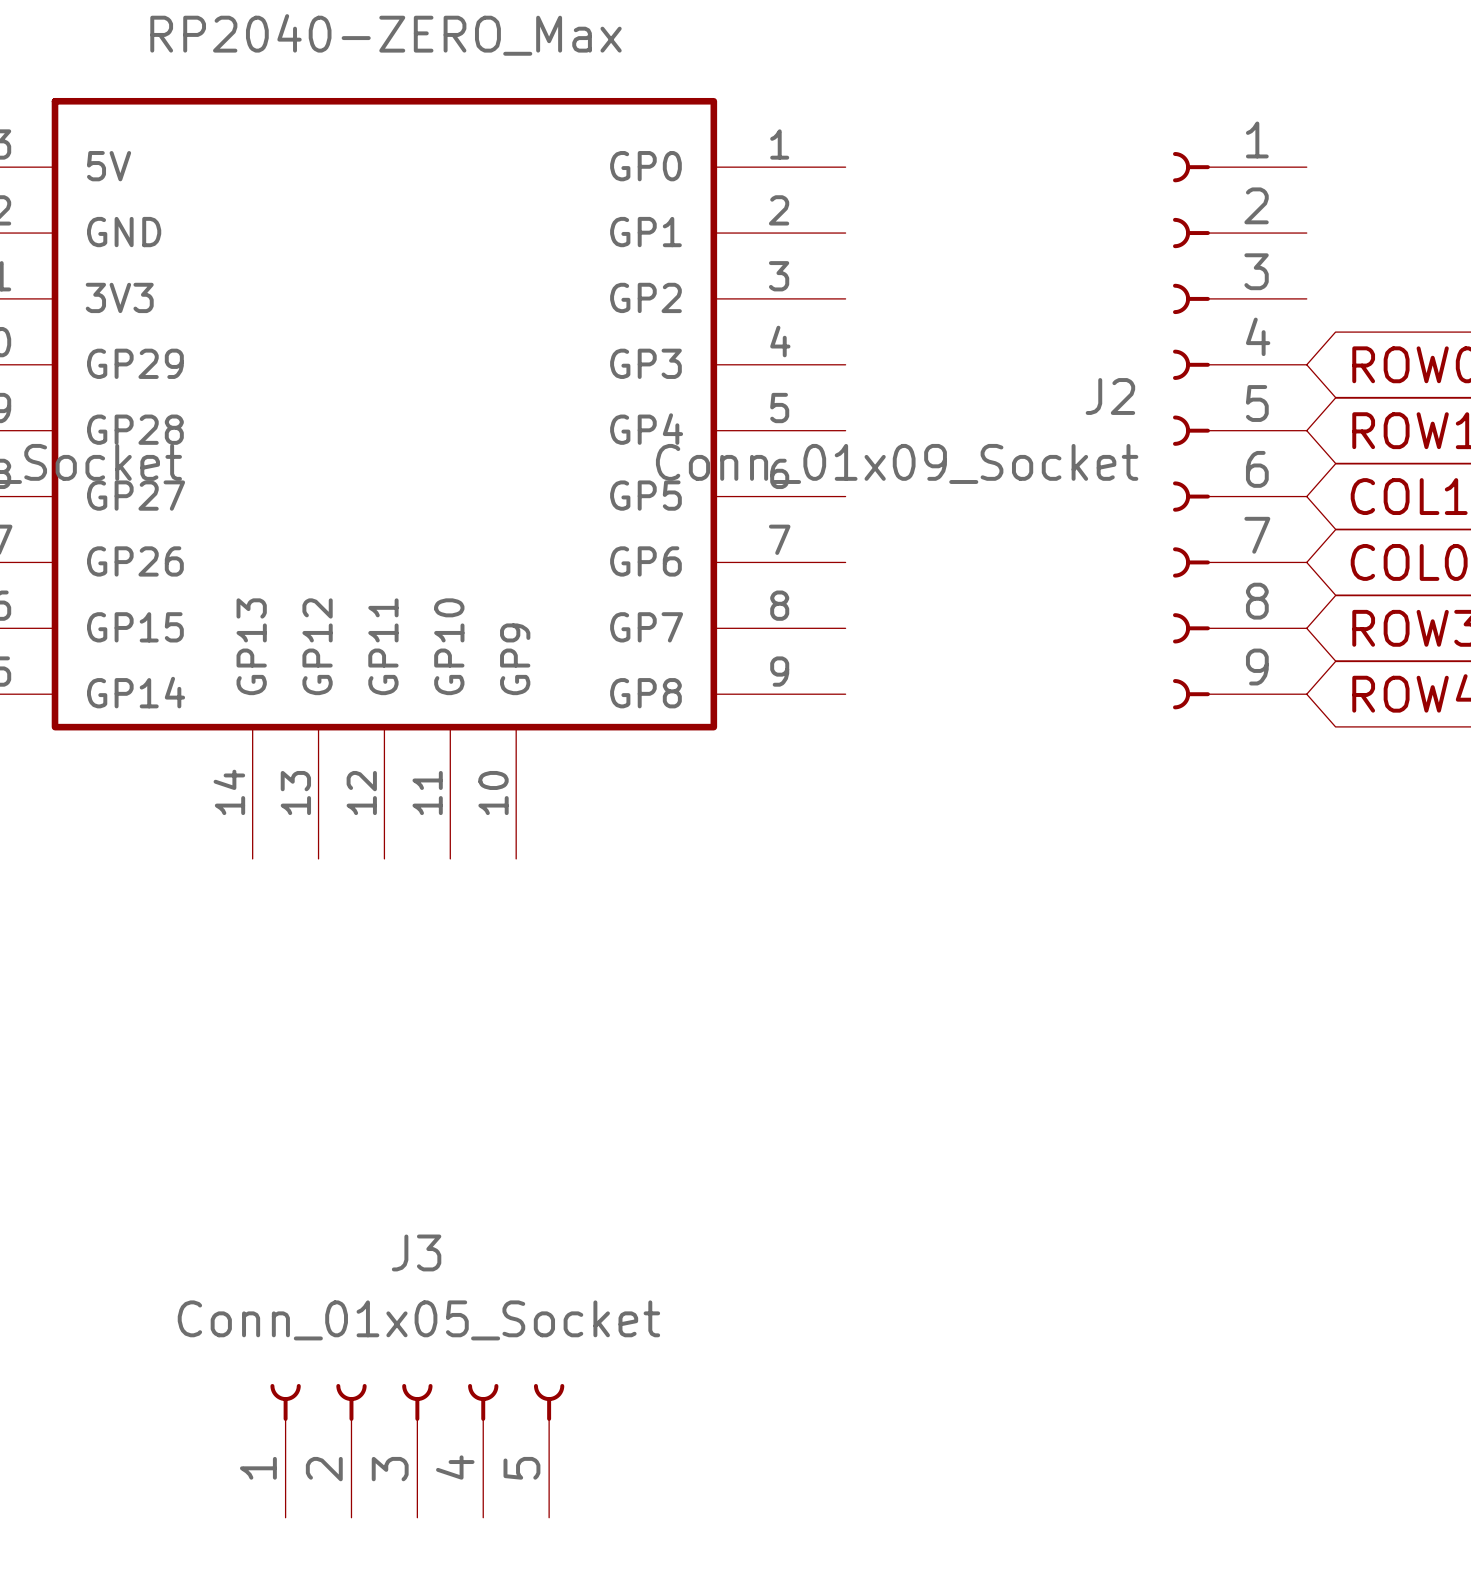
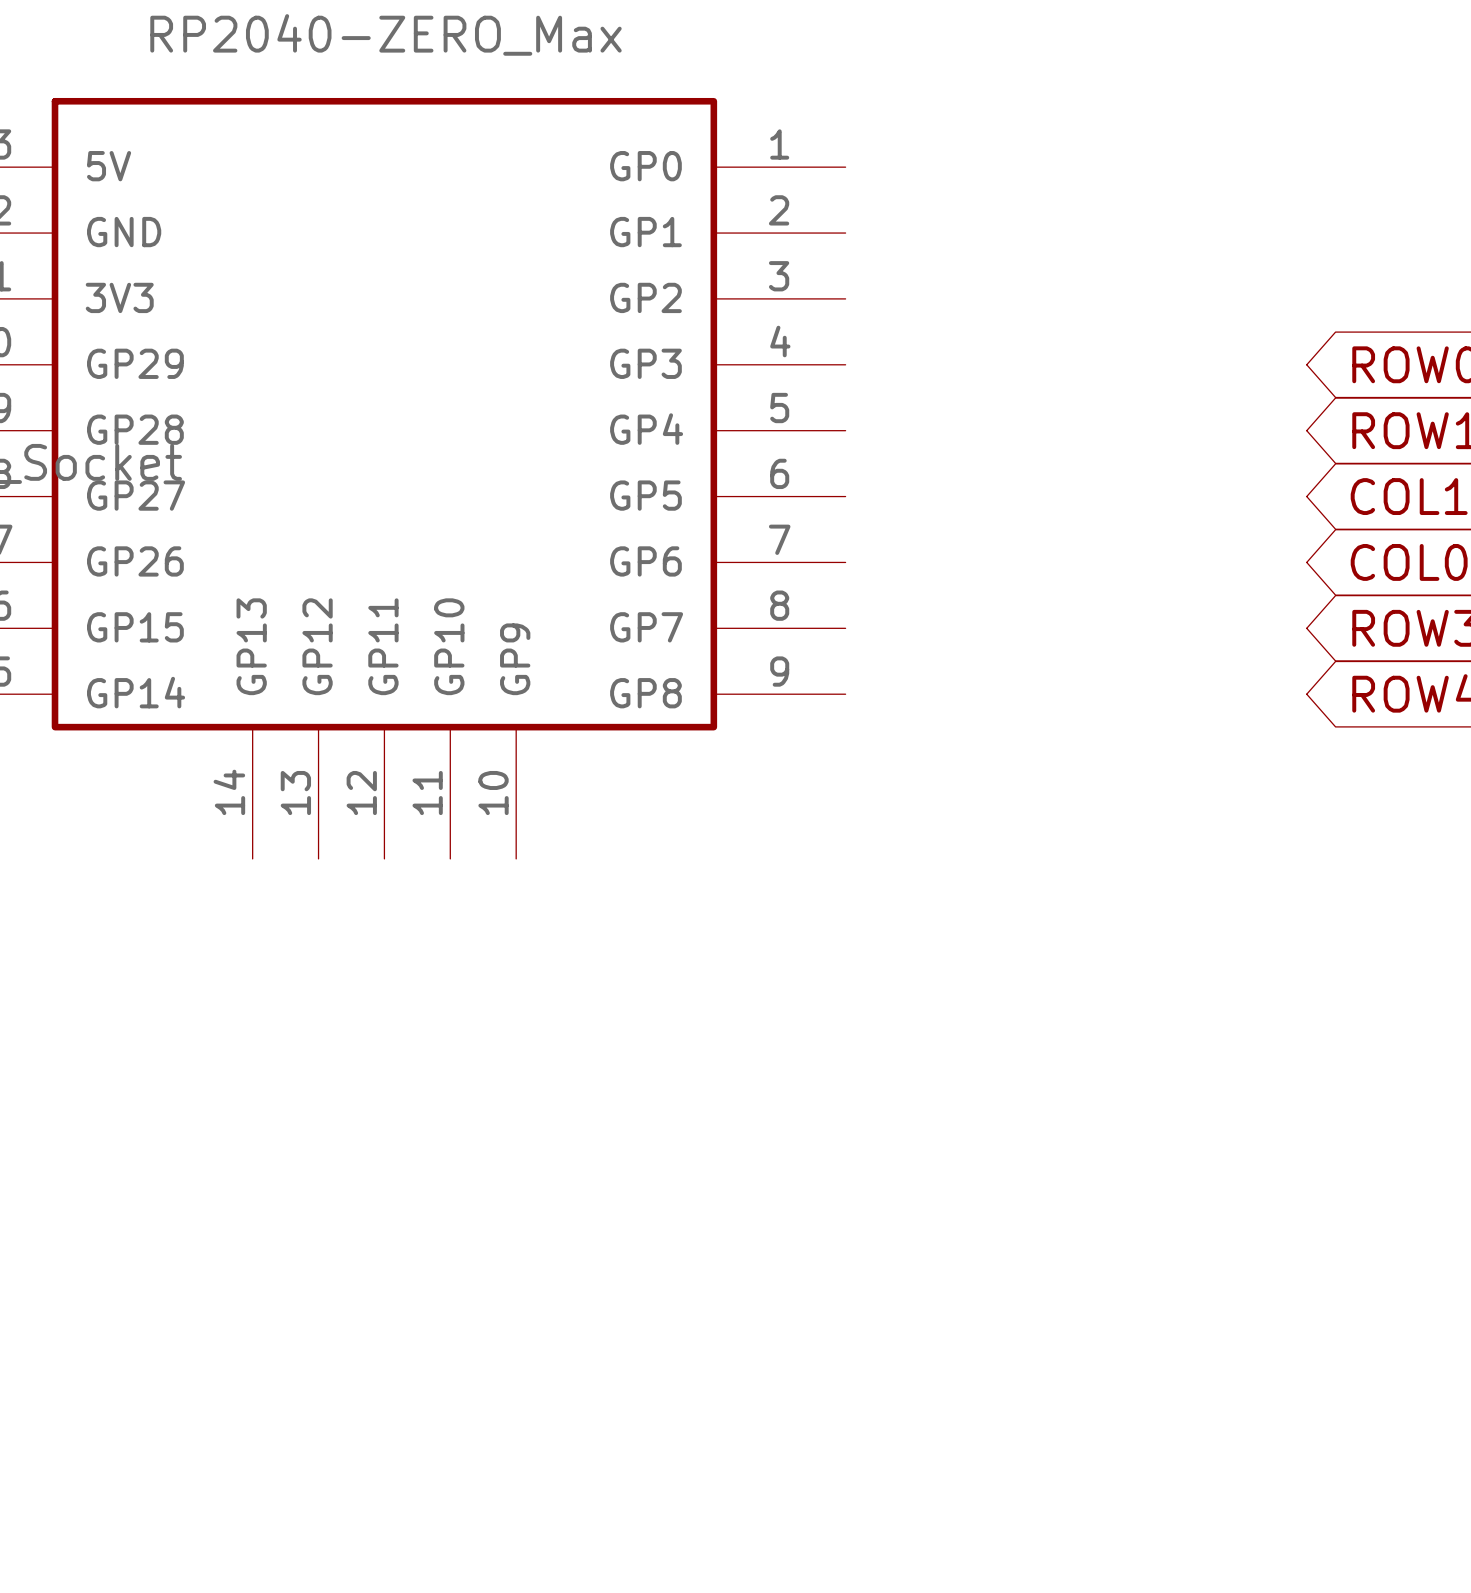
J2: Conn_01x09_Socket (1239, 430) -> none
J3: Conn_01x05_Socket (417, 1450) -> none

